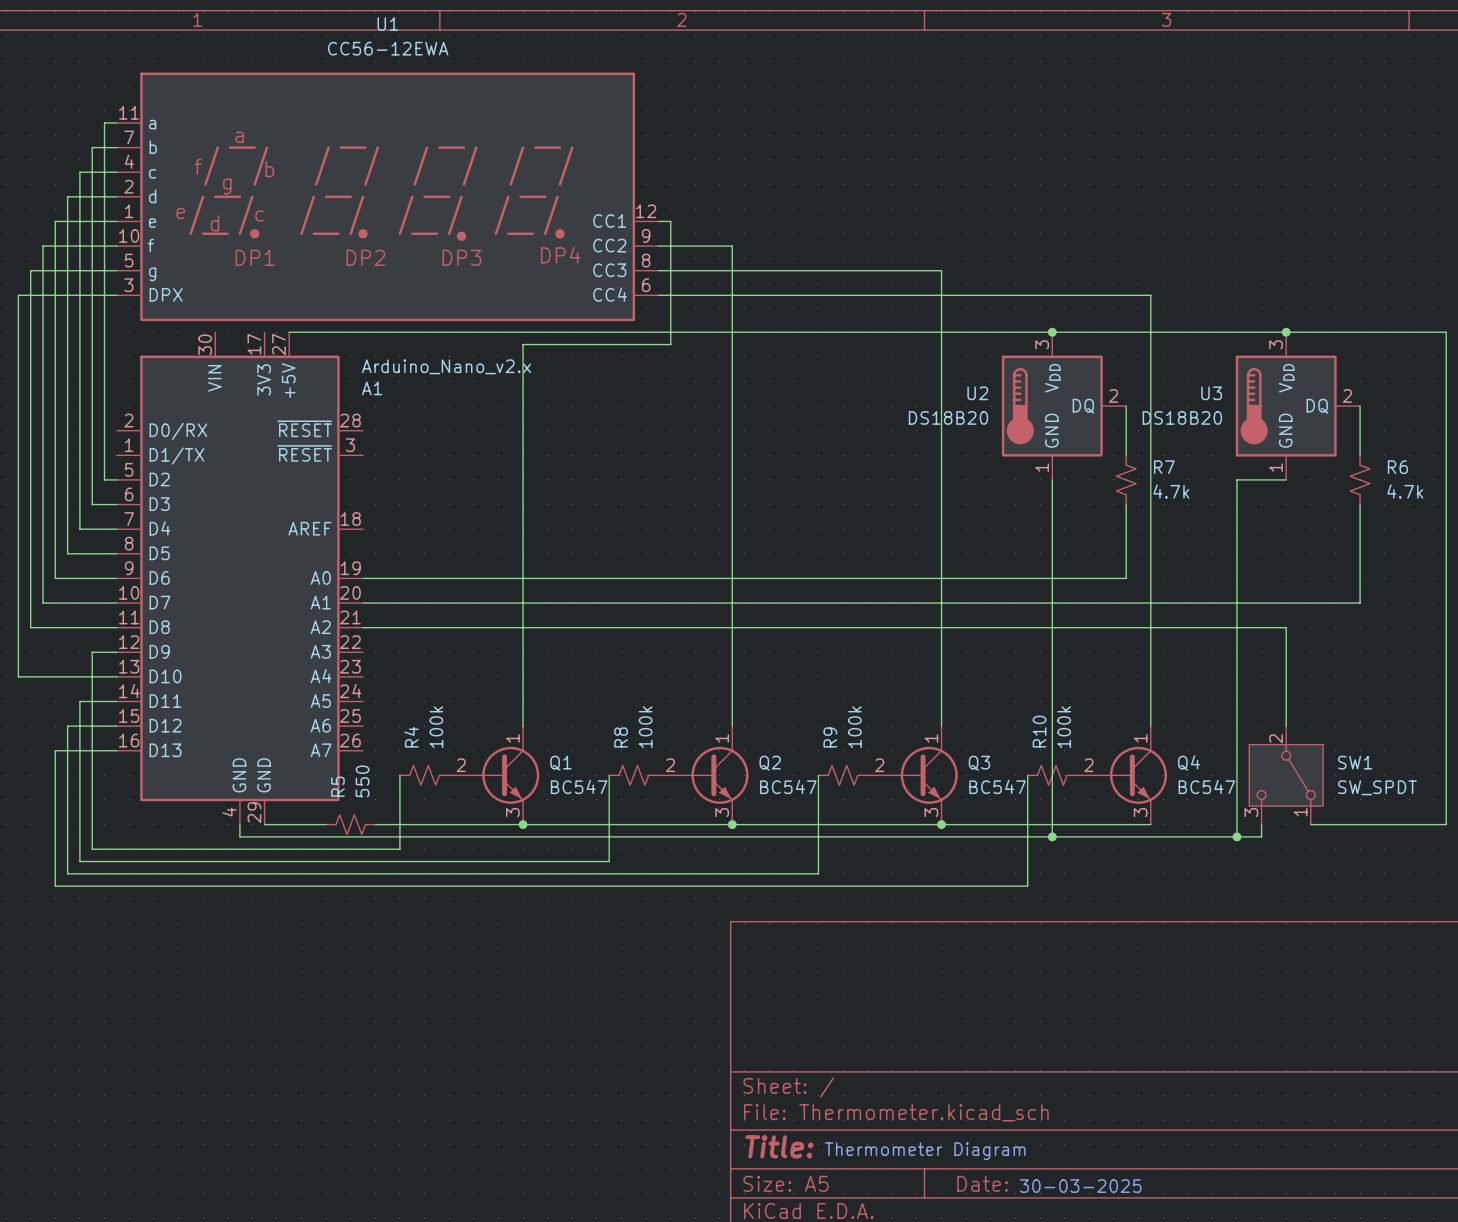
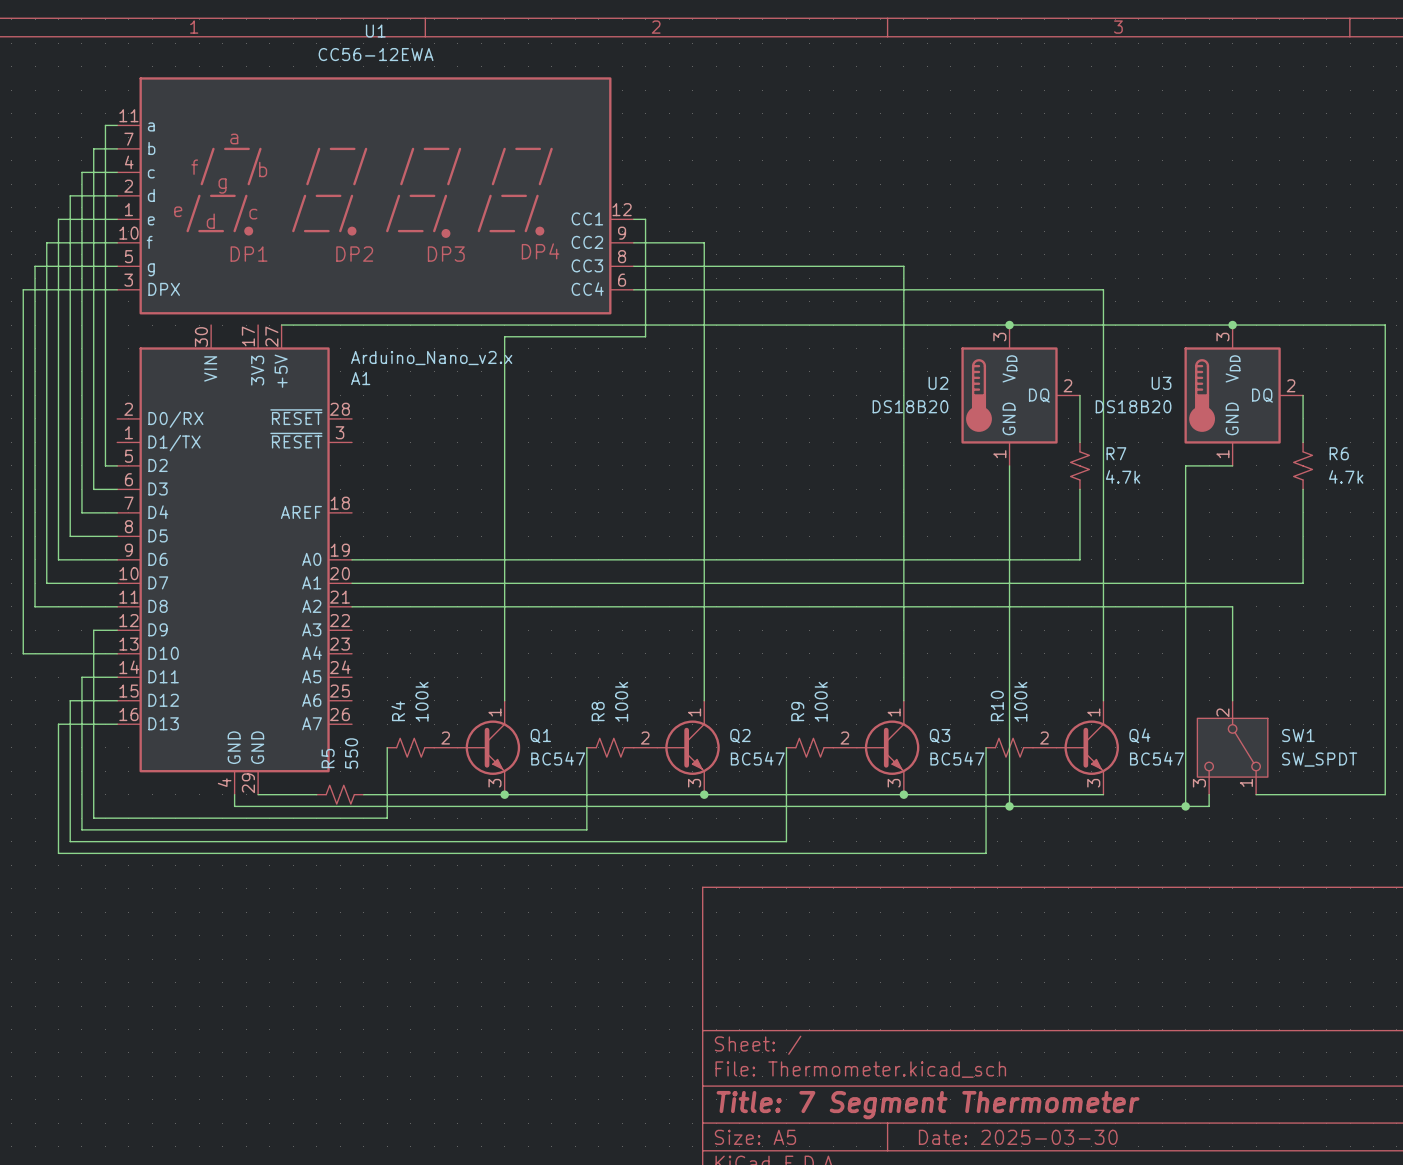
title block: Title: (779, 1146) -> Title: 7 Segment Thermometer (928, 1105)
text: Thermometer Diagram (925, 1151) -> none
title block: Date: (982, 1183) -> Date: 2025-03-30 (1018, 1137)
text: 30-03-2025 (1080, 1186) -> none

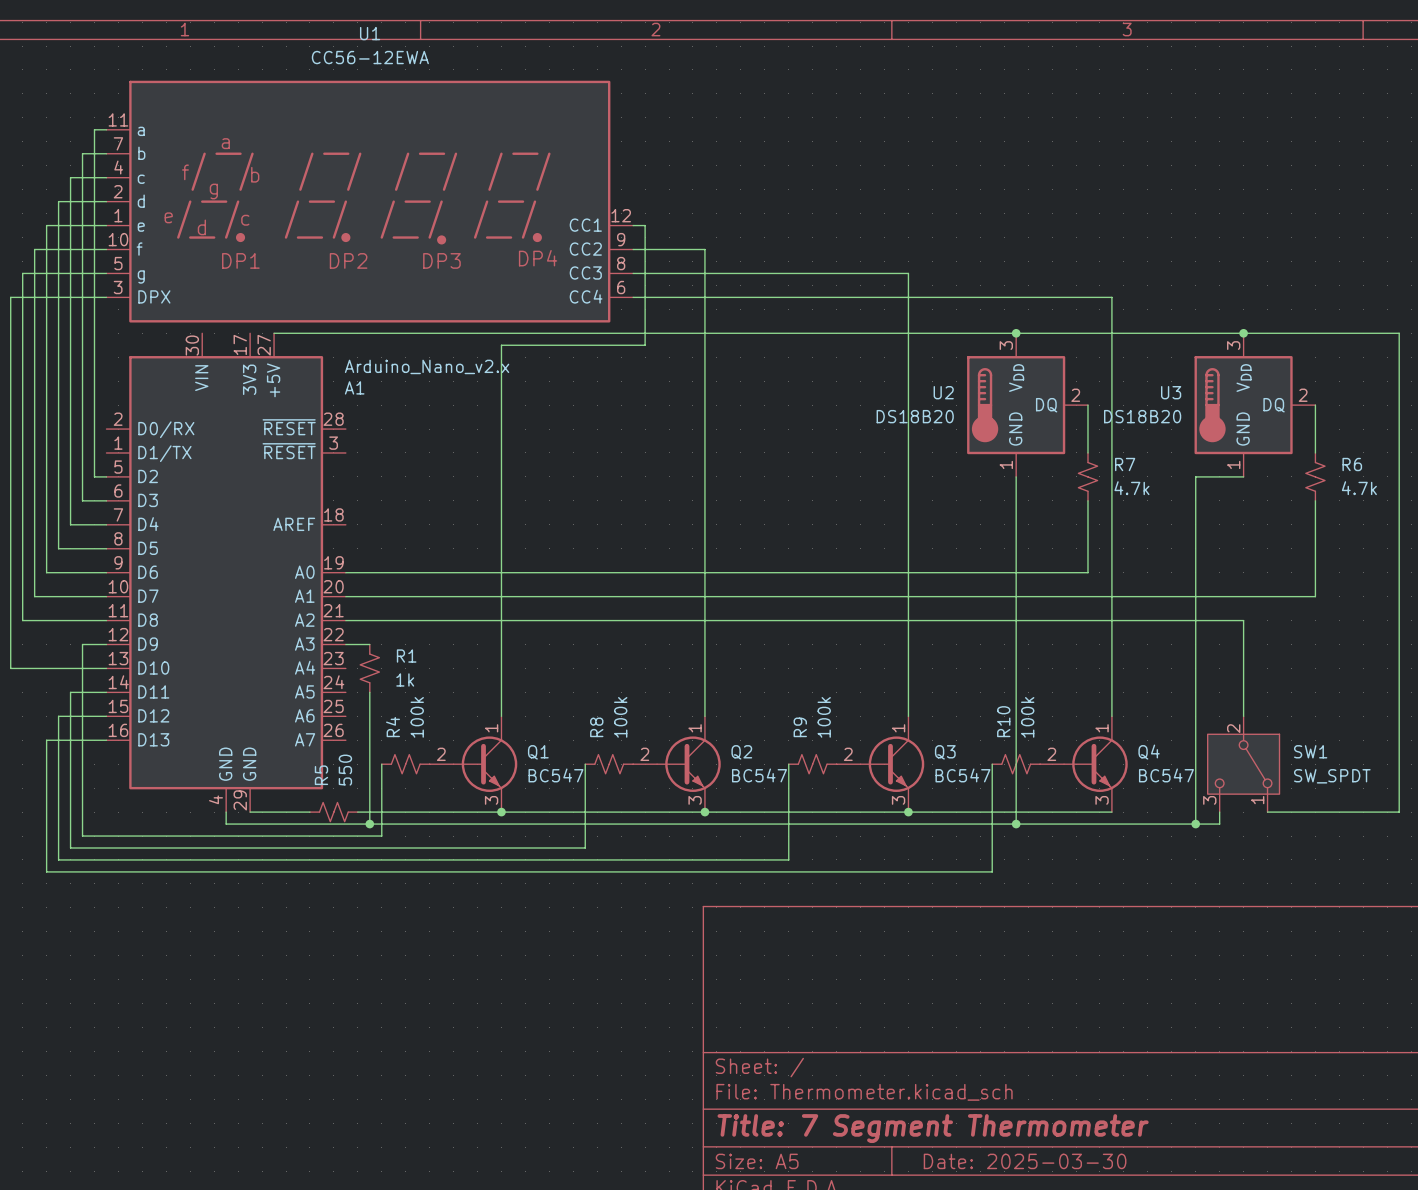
wire: none -> (345, 644) (369, 644)
R1: none -> 1k (369, 668)
wire: none -> (369, 692) (369, 824)
junction: none -> (369, 824)

